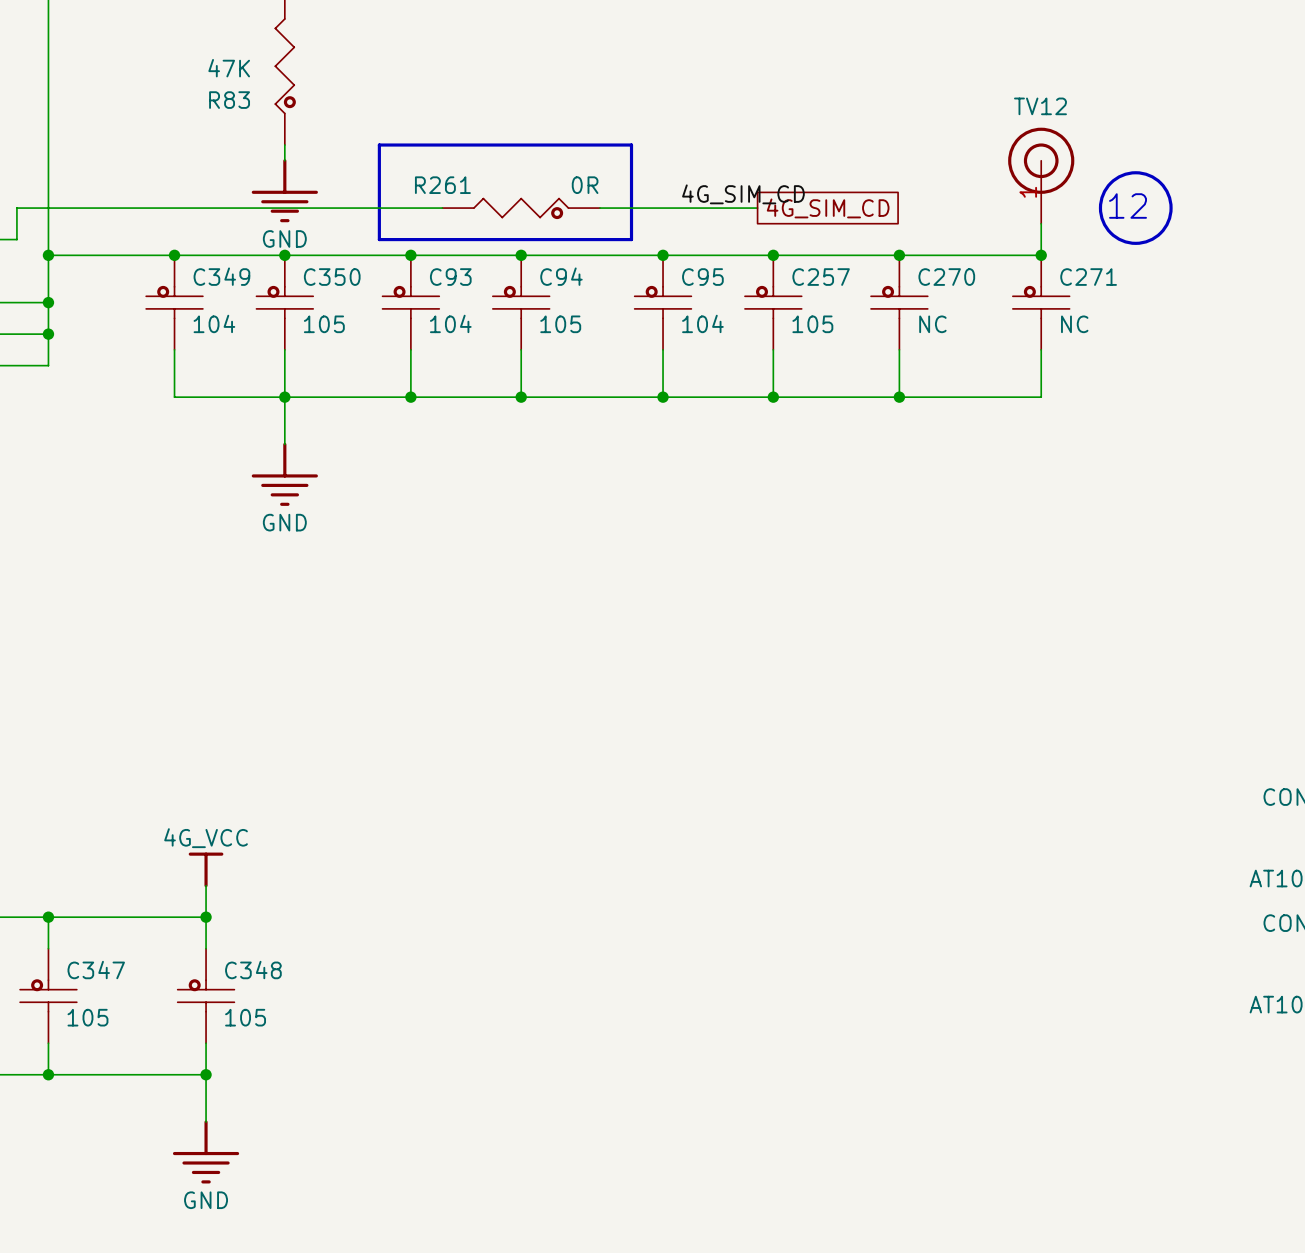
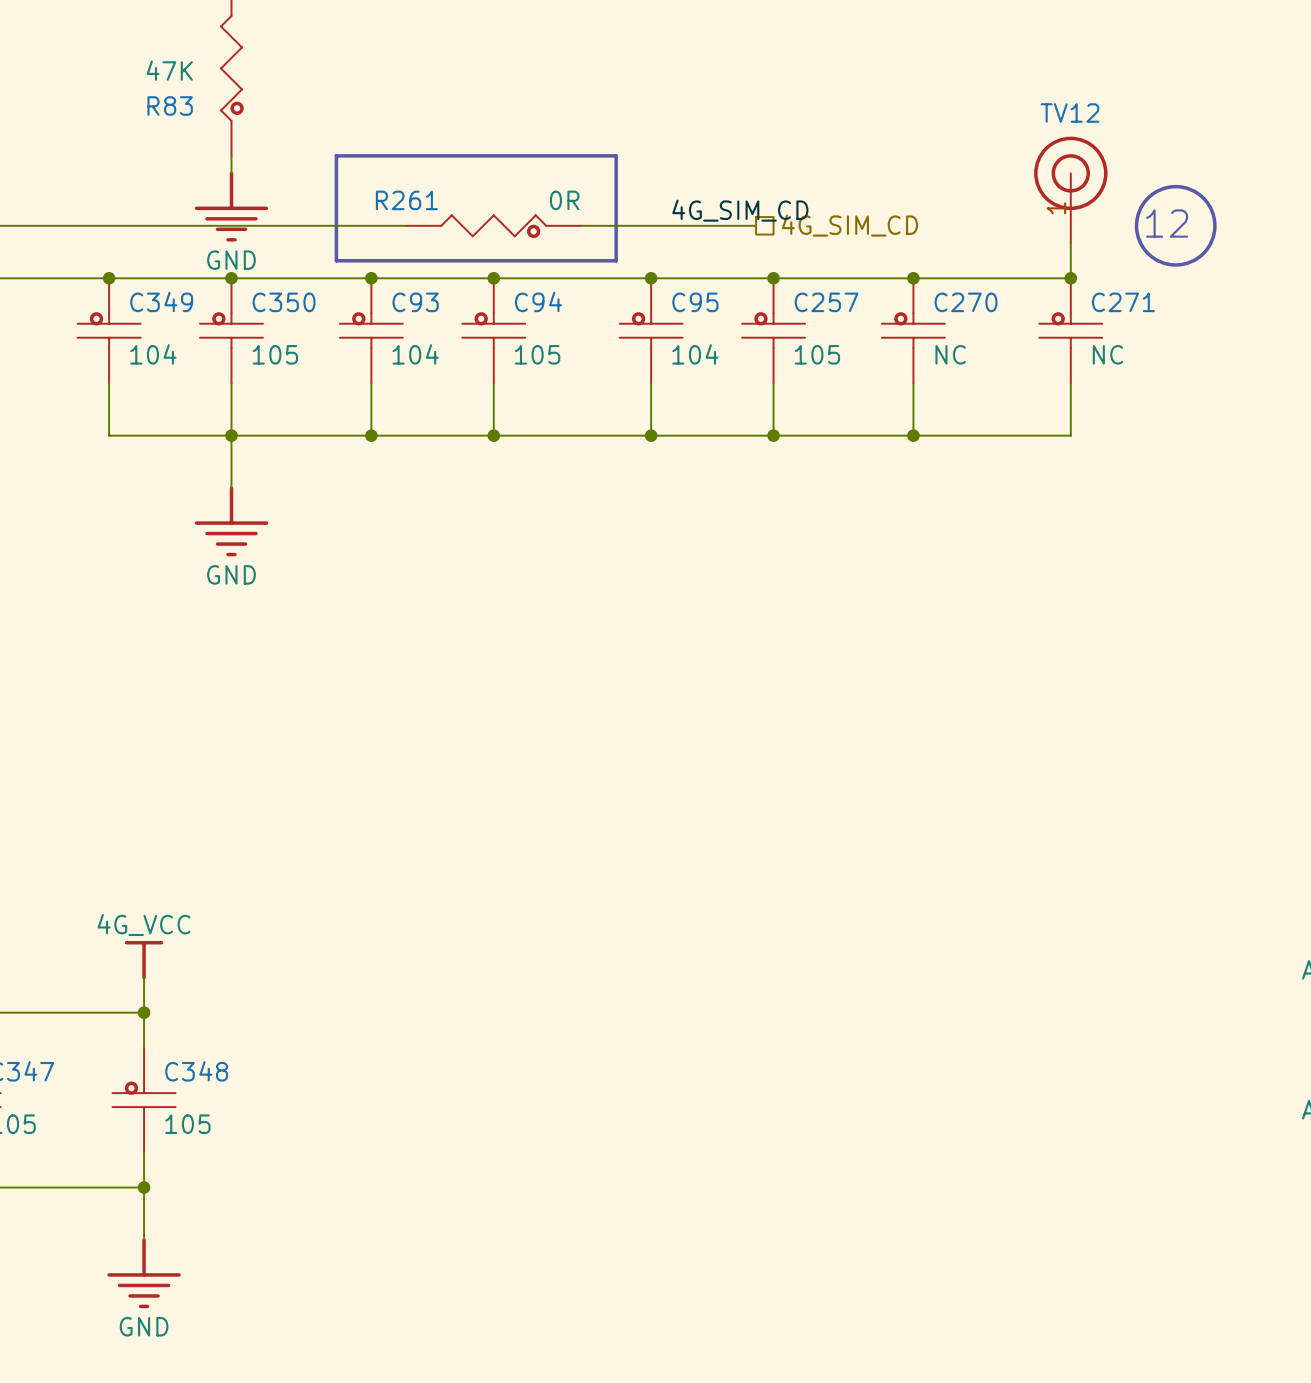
hierarchical label: none -> 4G_SIM_CD (850, 225)
global label: 4G_SIM_CD (828, 208) -> none

